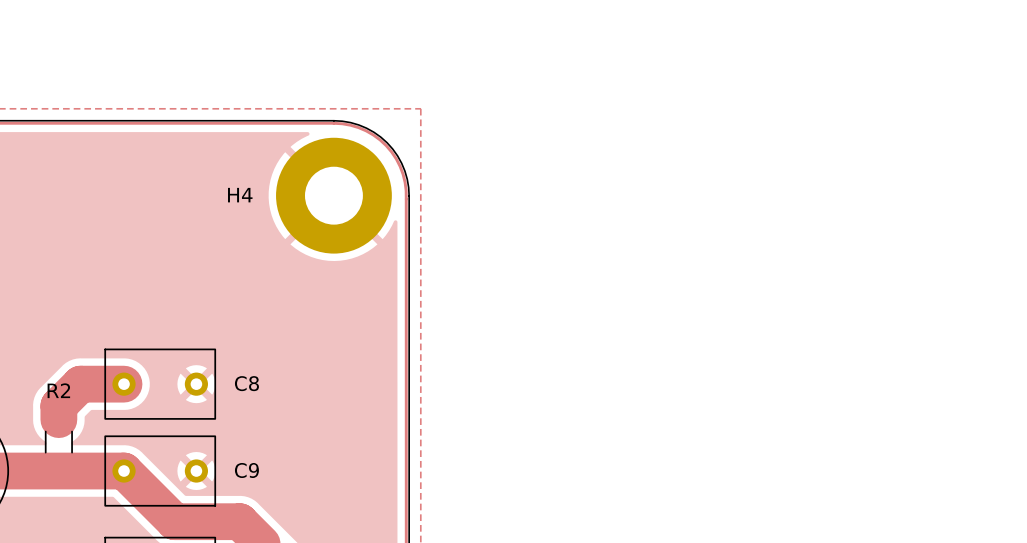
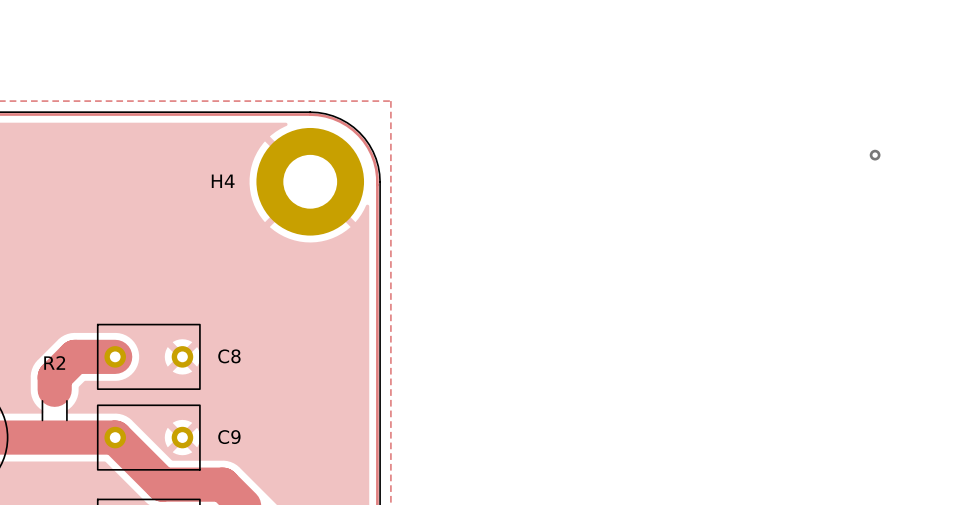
via: none -> (875, 155)

